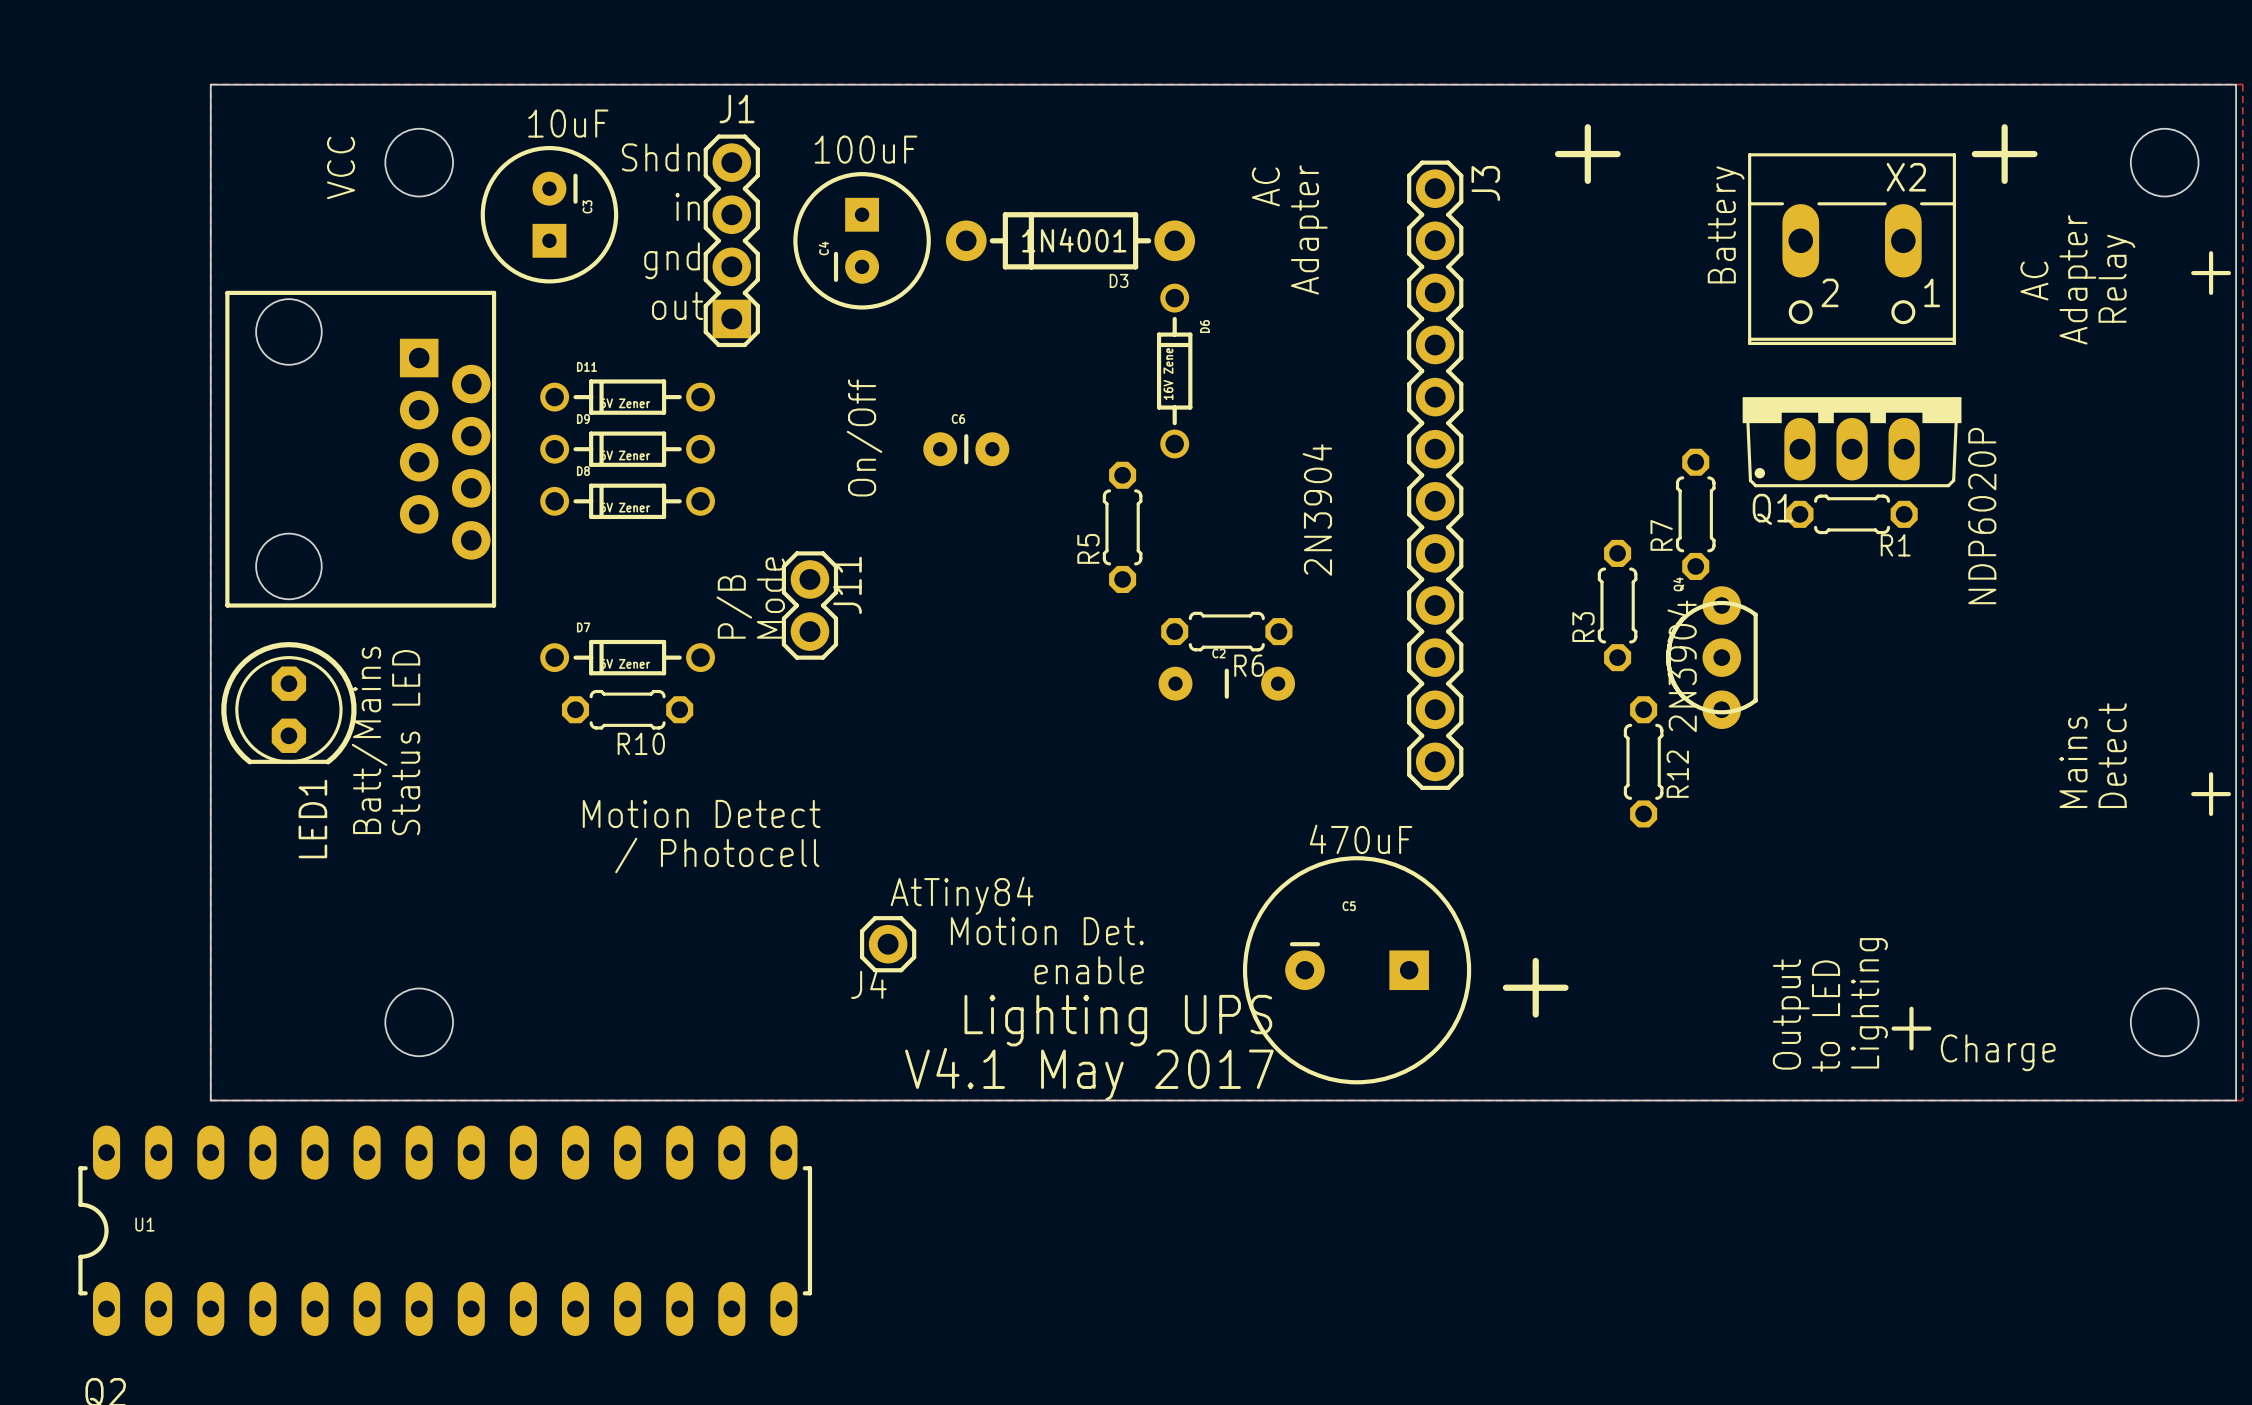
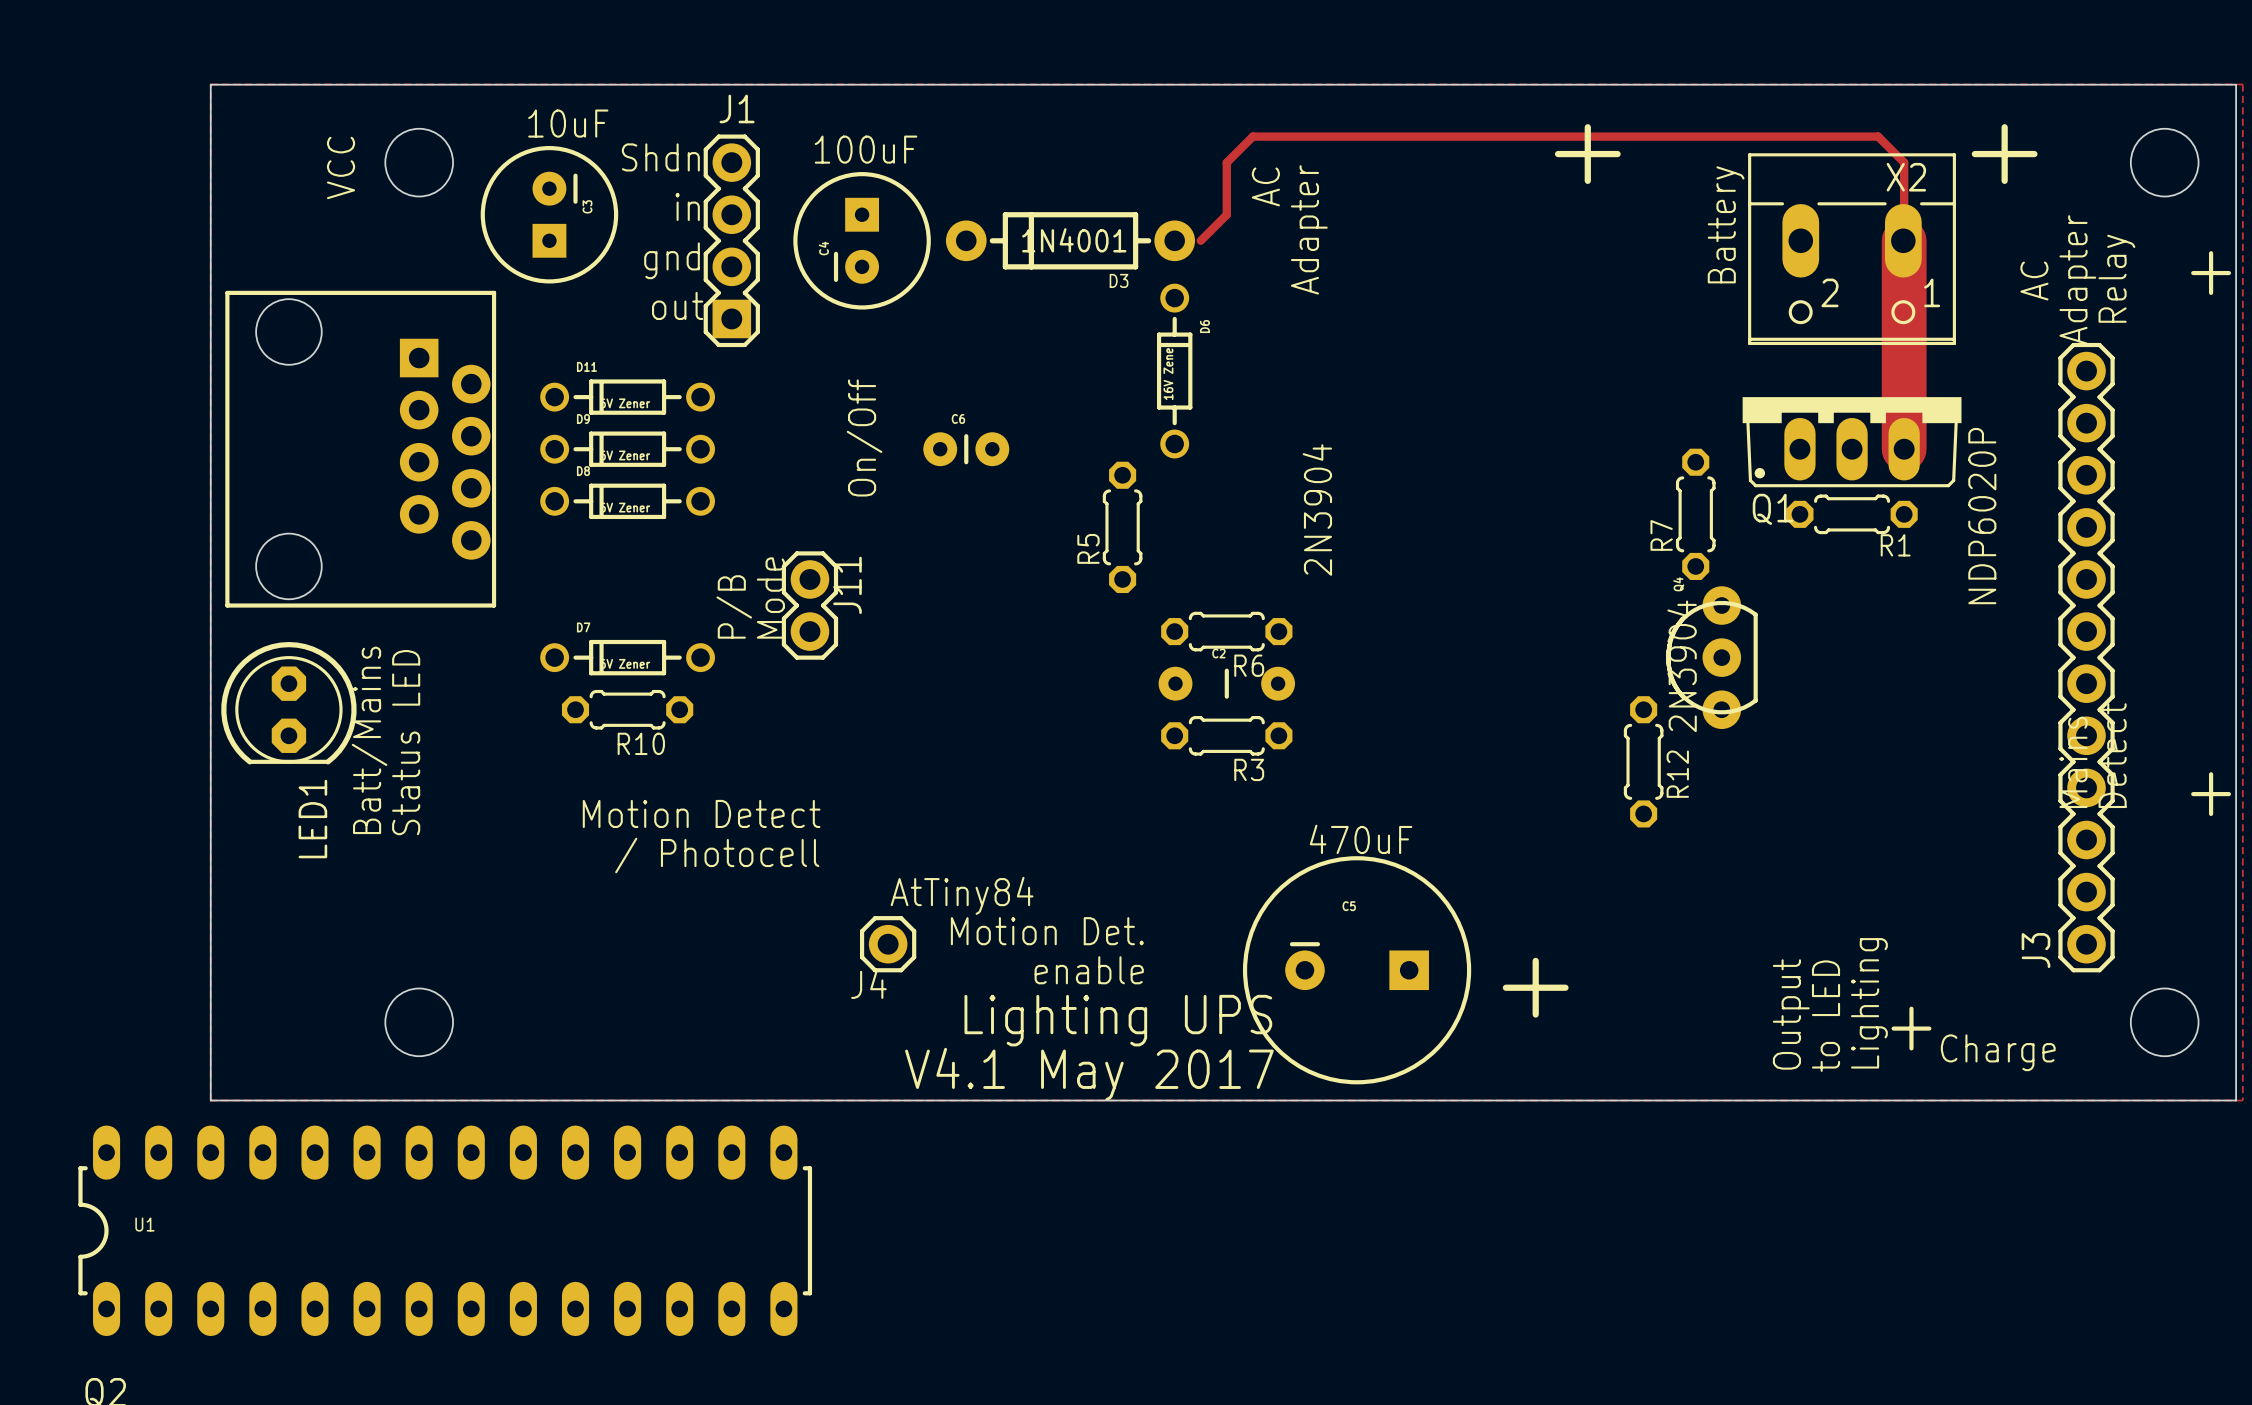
J3 name position: J3 (1485, 183) -> J3 (2035, 950)
track: none -> (1200, 240) (1226, 214) (1226, 162) (1252, 136) (1878, 136) (1904, 162) (1903, 240)
track: none -> (1904, 240) (1904, 449)
J3 position: (1435, 475) -> (2086, 657)
R3 rotation: 0° (1617, 605) -> 90° clockwise (1226, 735)
R3 position: (1617, 605) -> (1226, 735)
R3 name position: R3 (1583, 627) -> R3 (1249, 769)

